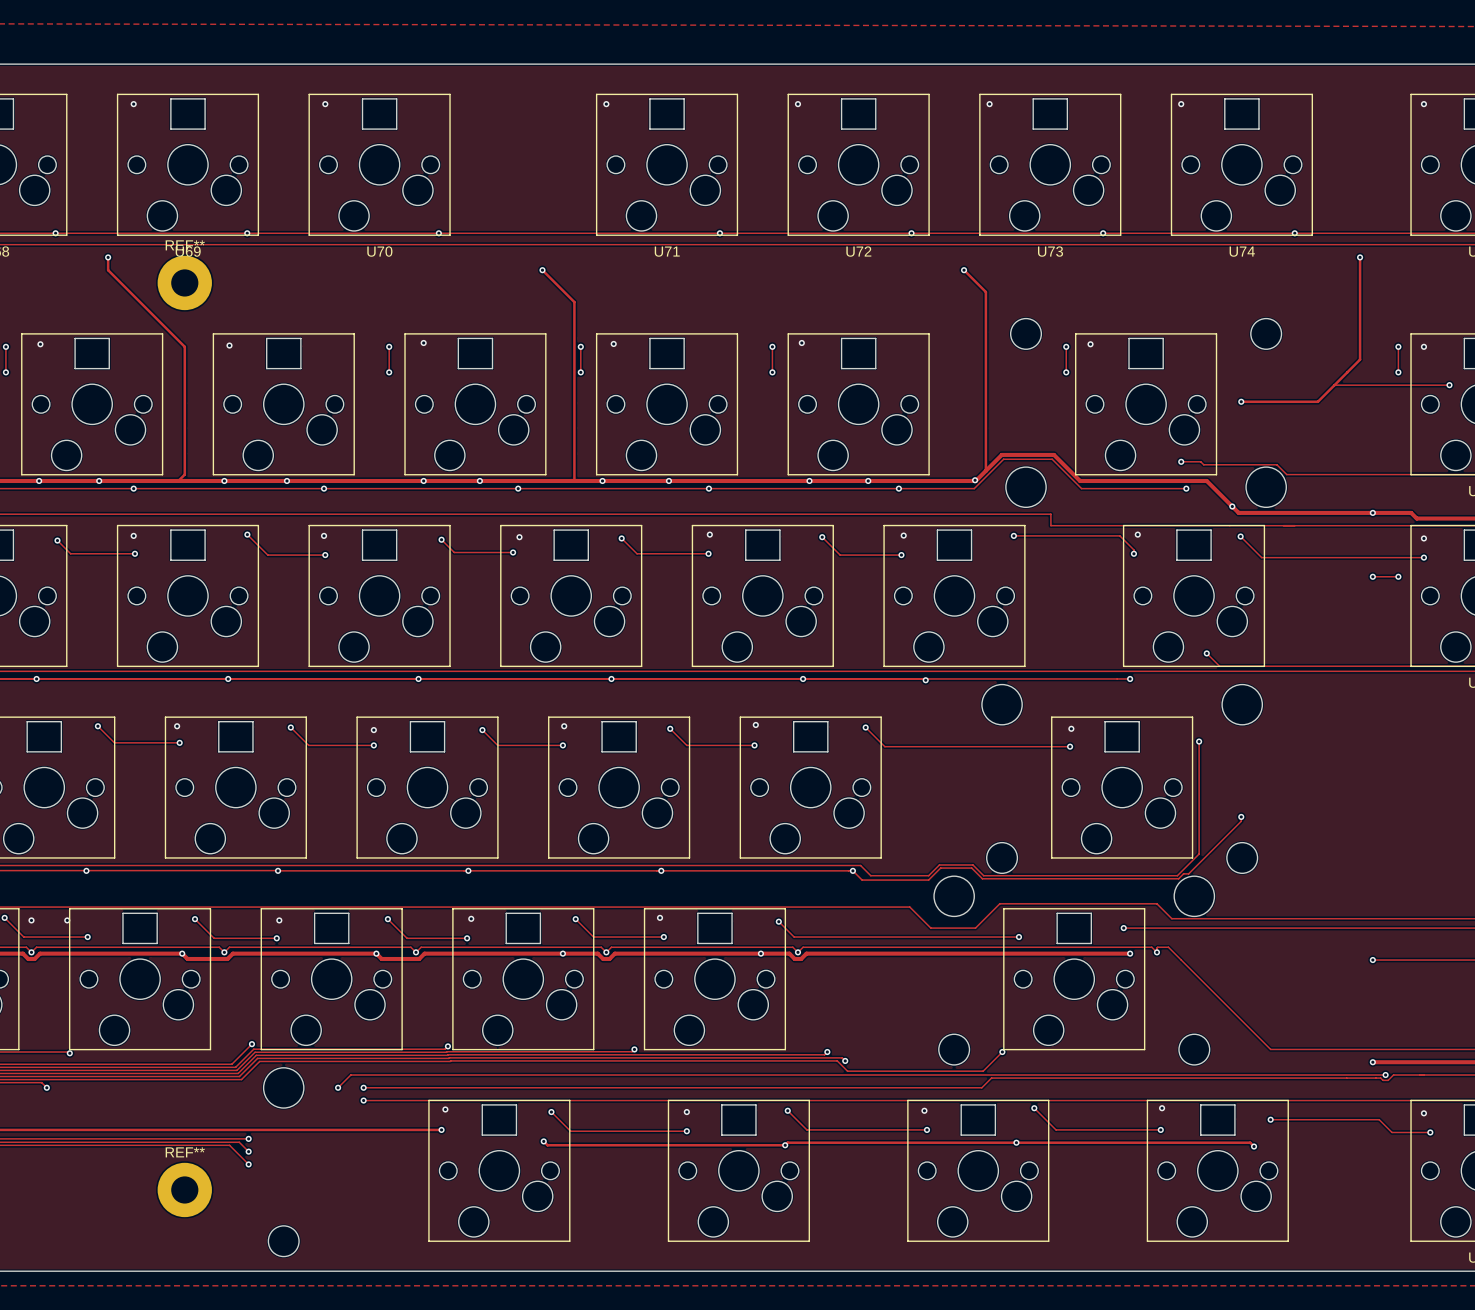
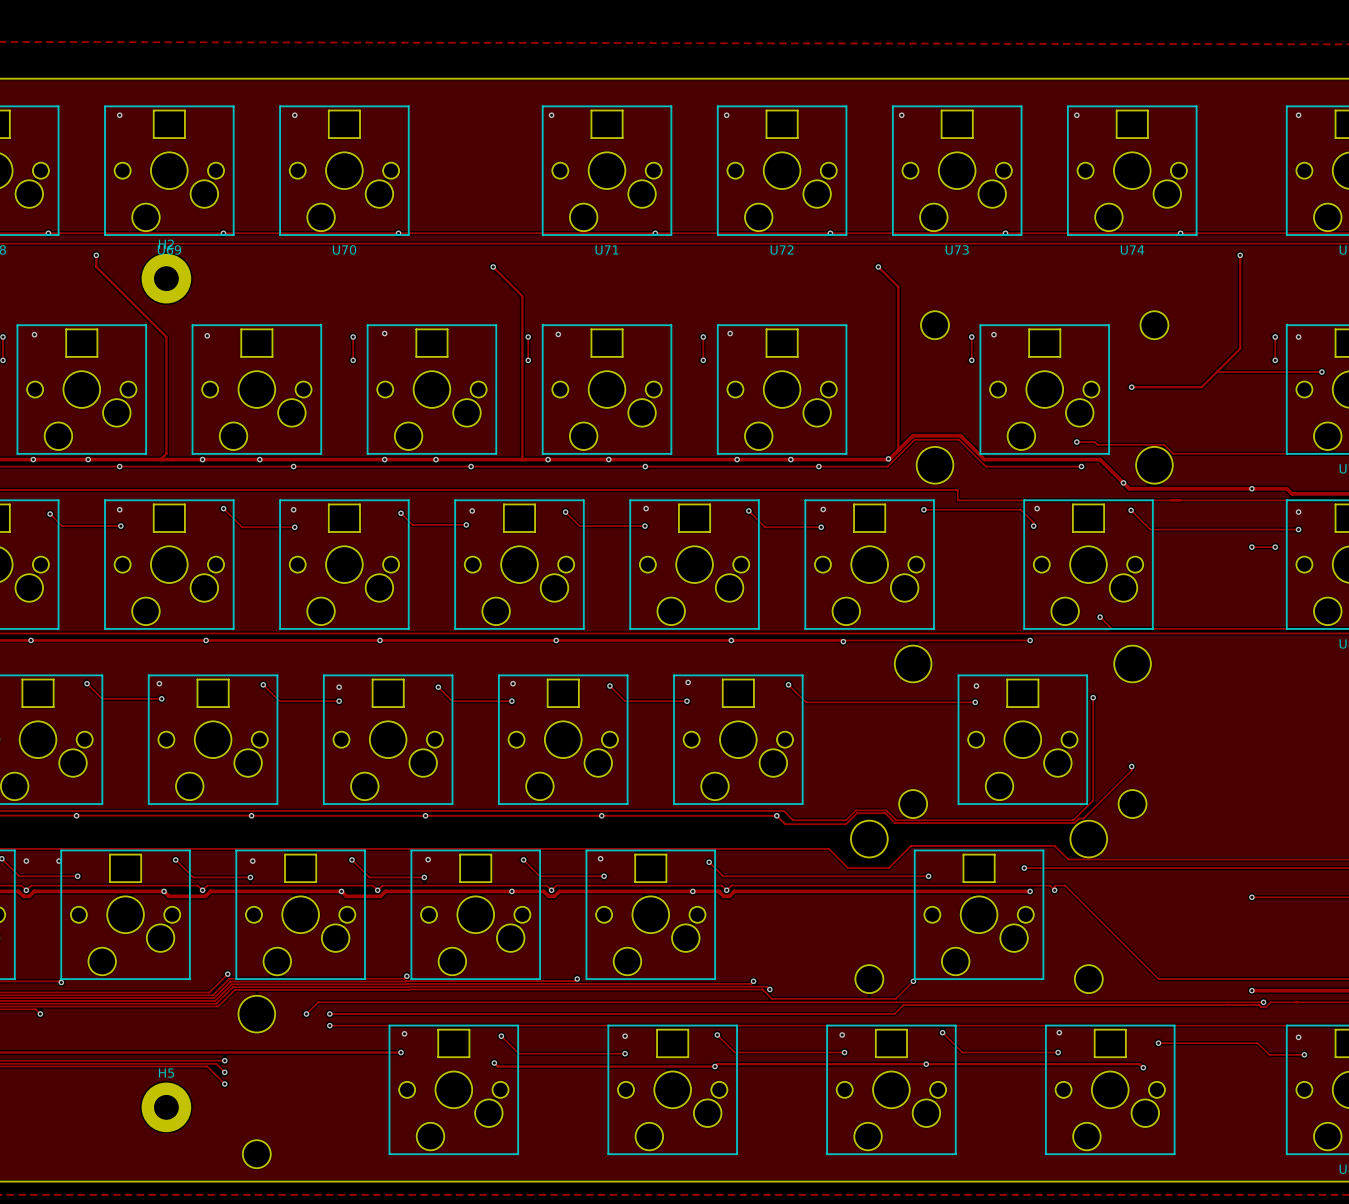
REF** name: REF** (185, 245) -> H2 (166, 244)
REF** name: REF** (185, 1152) -> H5 (166, 1073)

